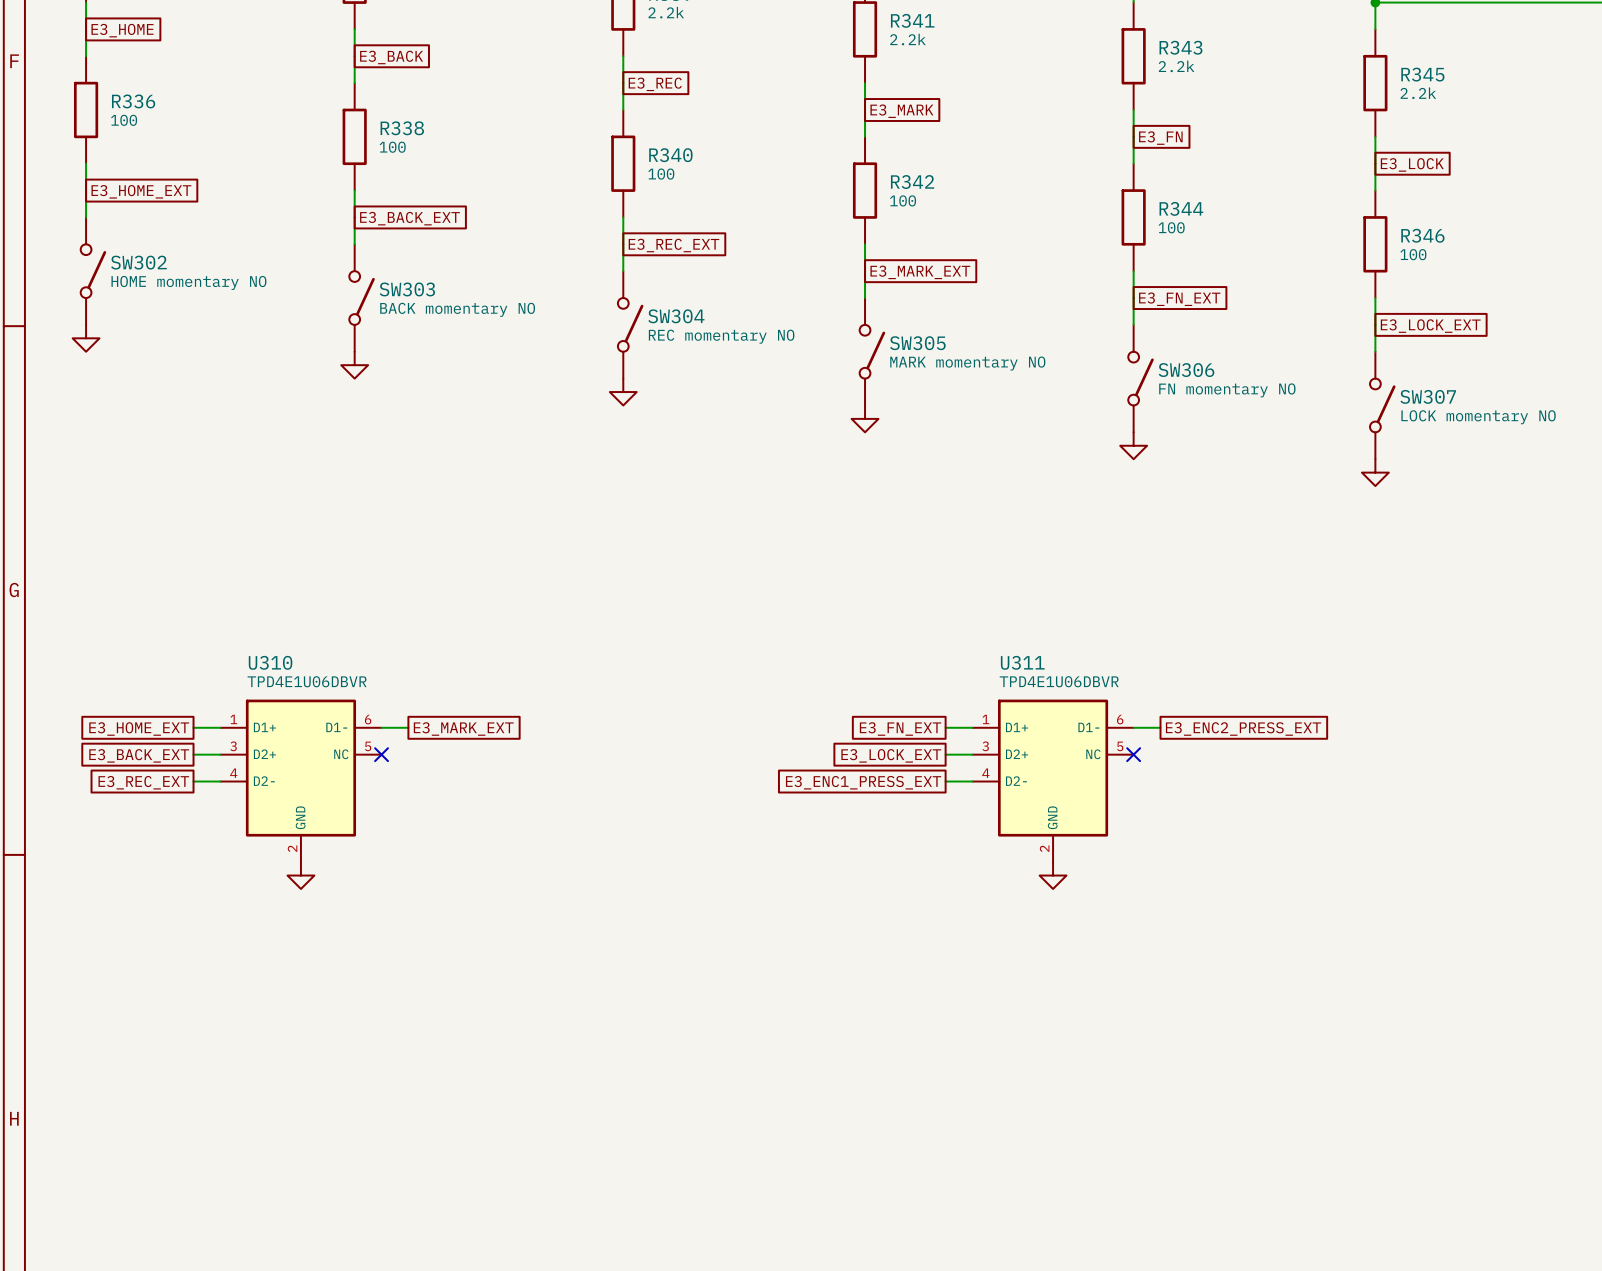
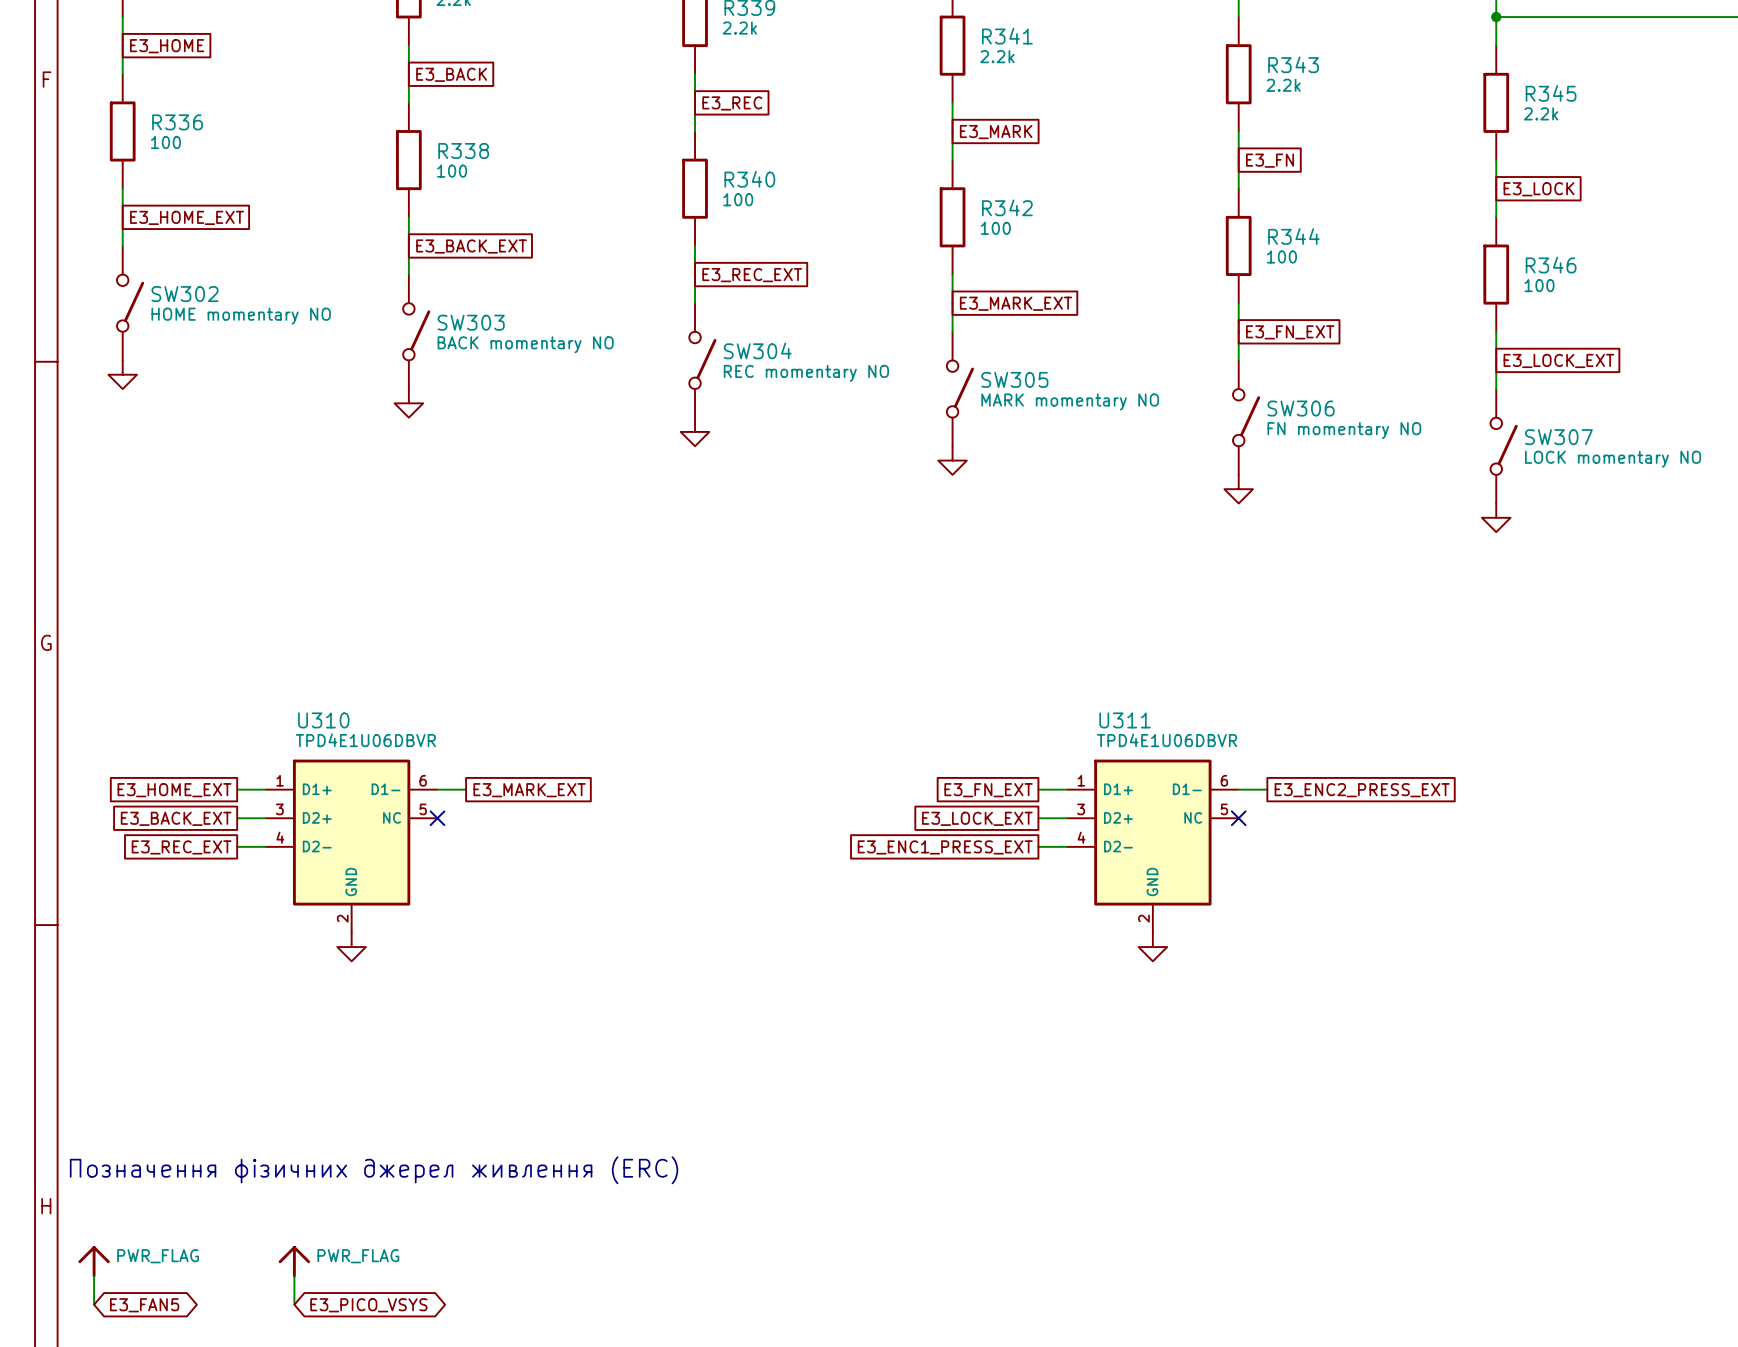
text: none -> Позначення фізичних джерел живлення (ERC) (374, 1170)
power symbol: none -> PWR_FLAG (94, 1261)
power symbol: none -> PWR_FLAG (294, 1261)
wire: none -> (94, 1276) (94, 1304)
wire: none -> (294, 1276) (294, 1304)
global label: none -> E3_FAN5 (144, 1305)
global label: none -> E3_PICO_VSYS (368, 1305)

